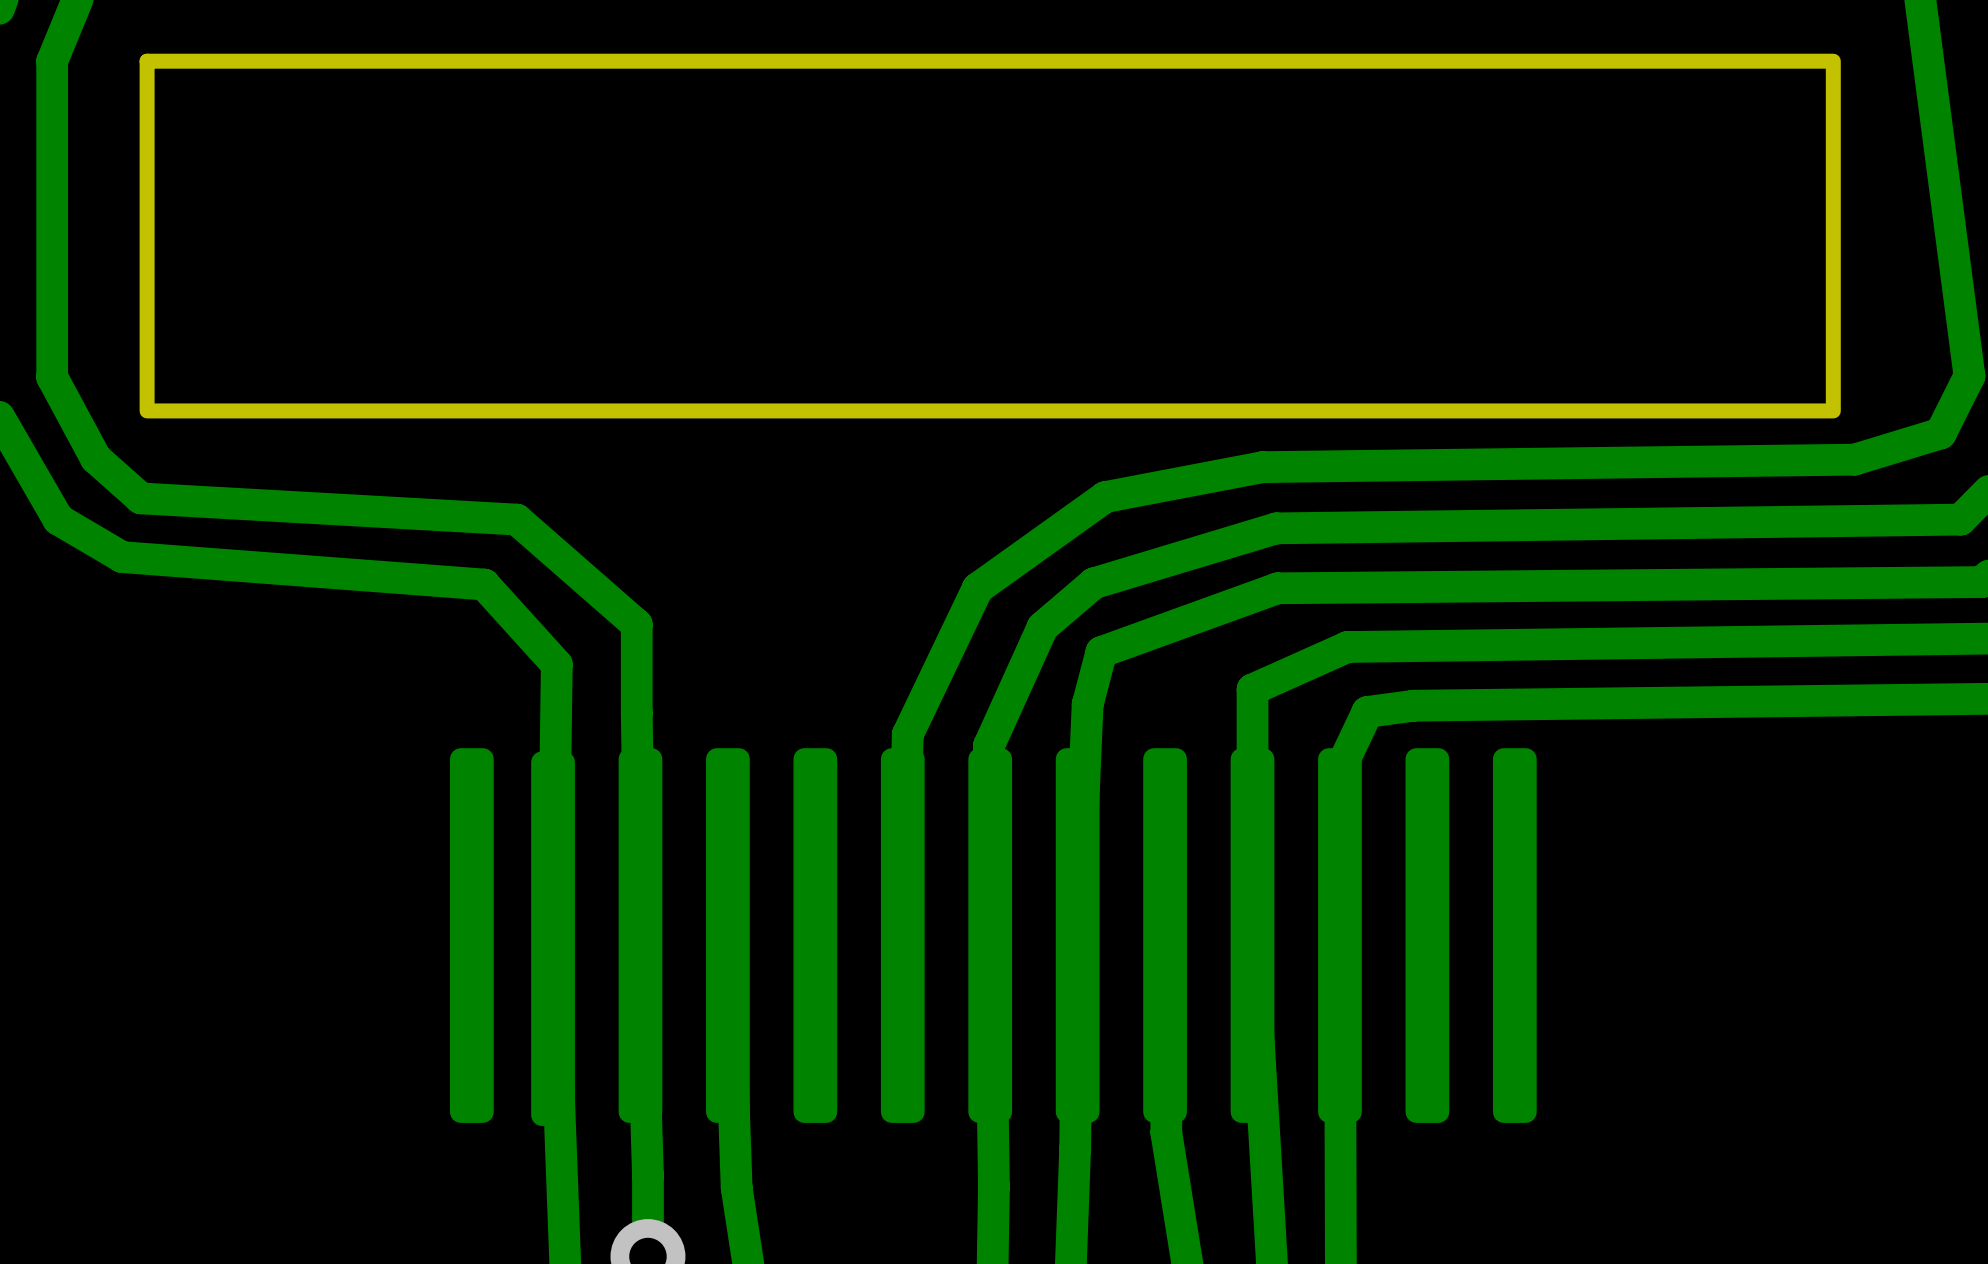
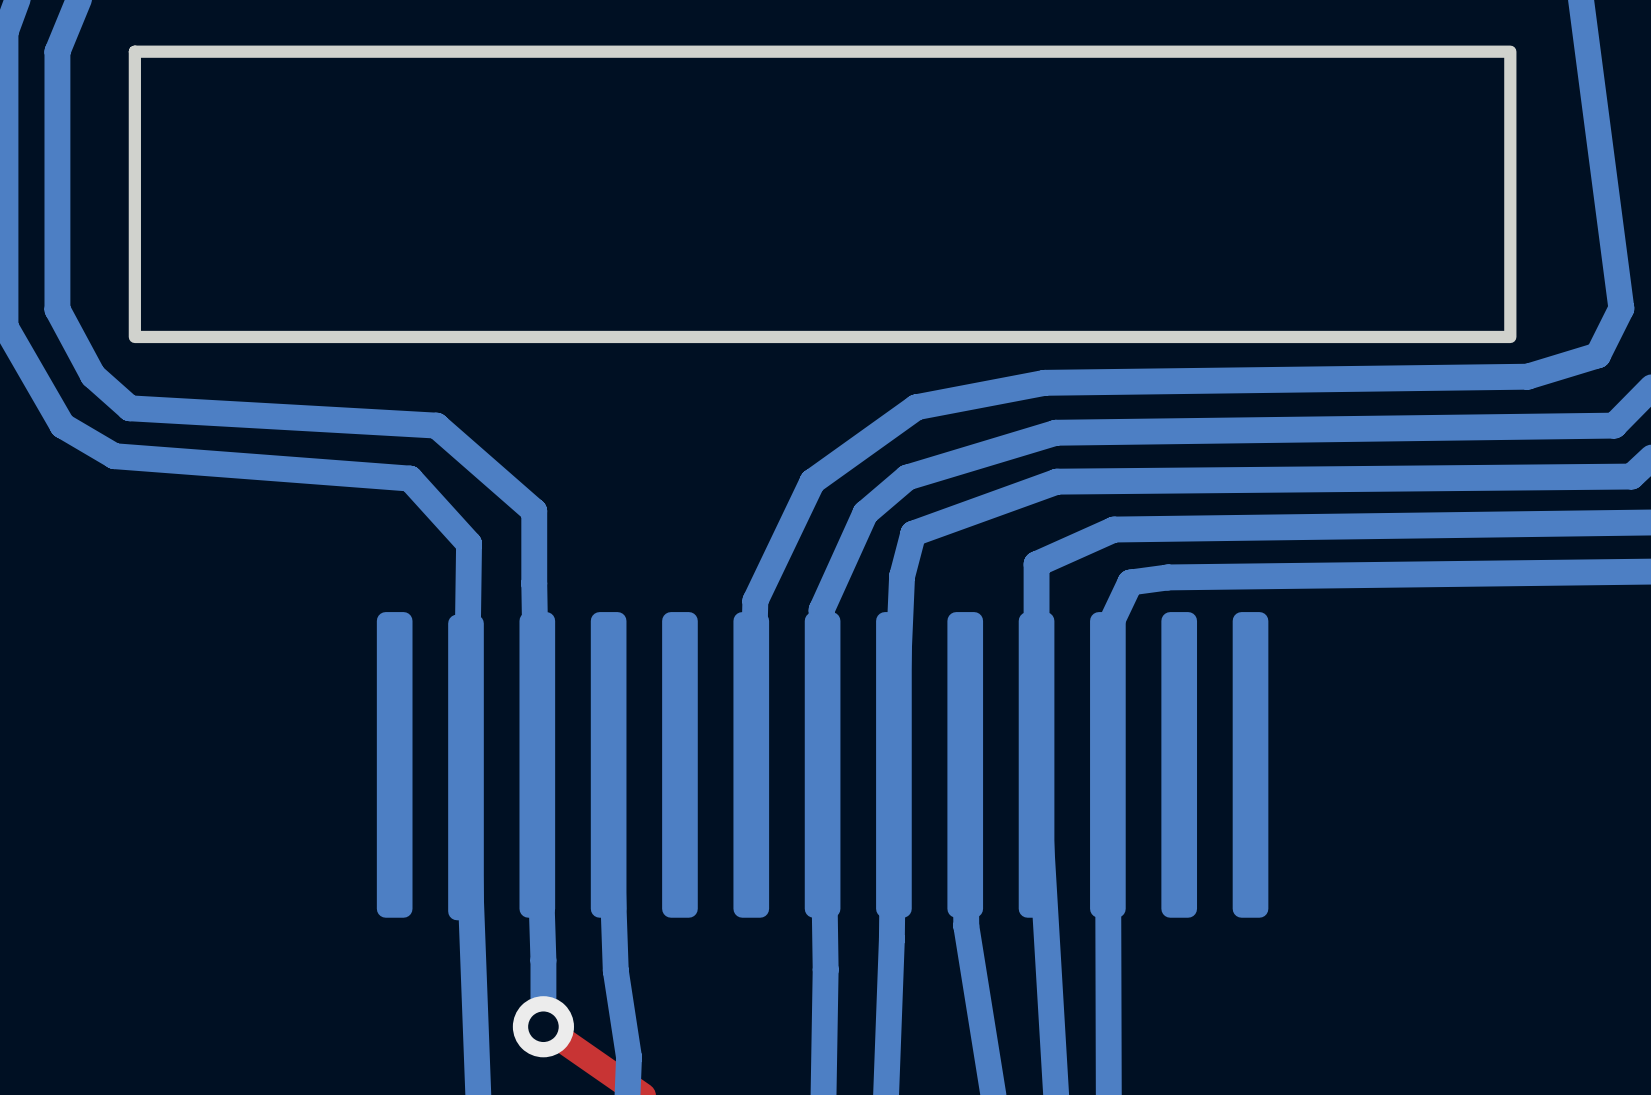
part footprint: [139, 53, 1841, 1127] -> [128, 45, 1517, 921]

